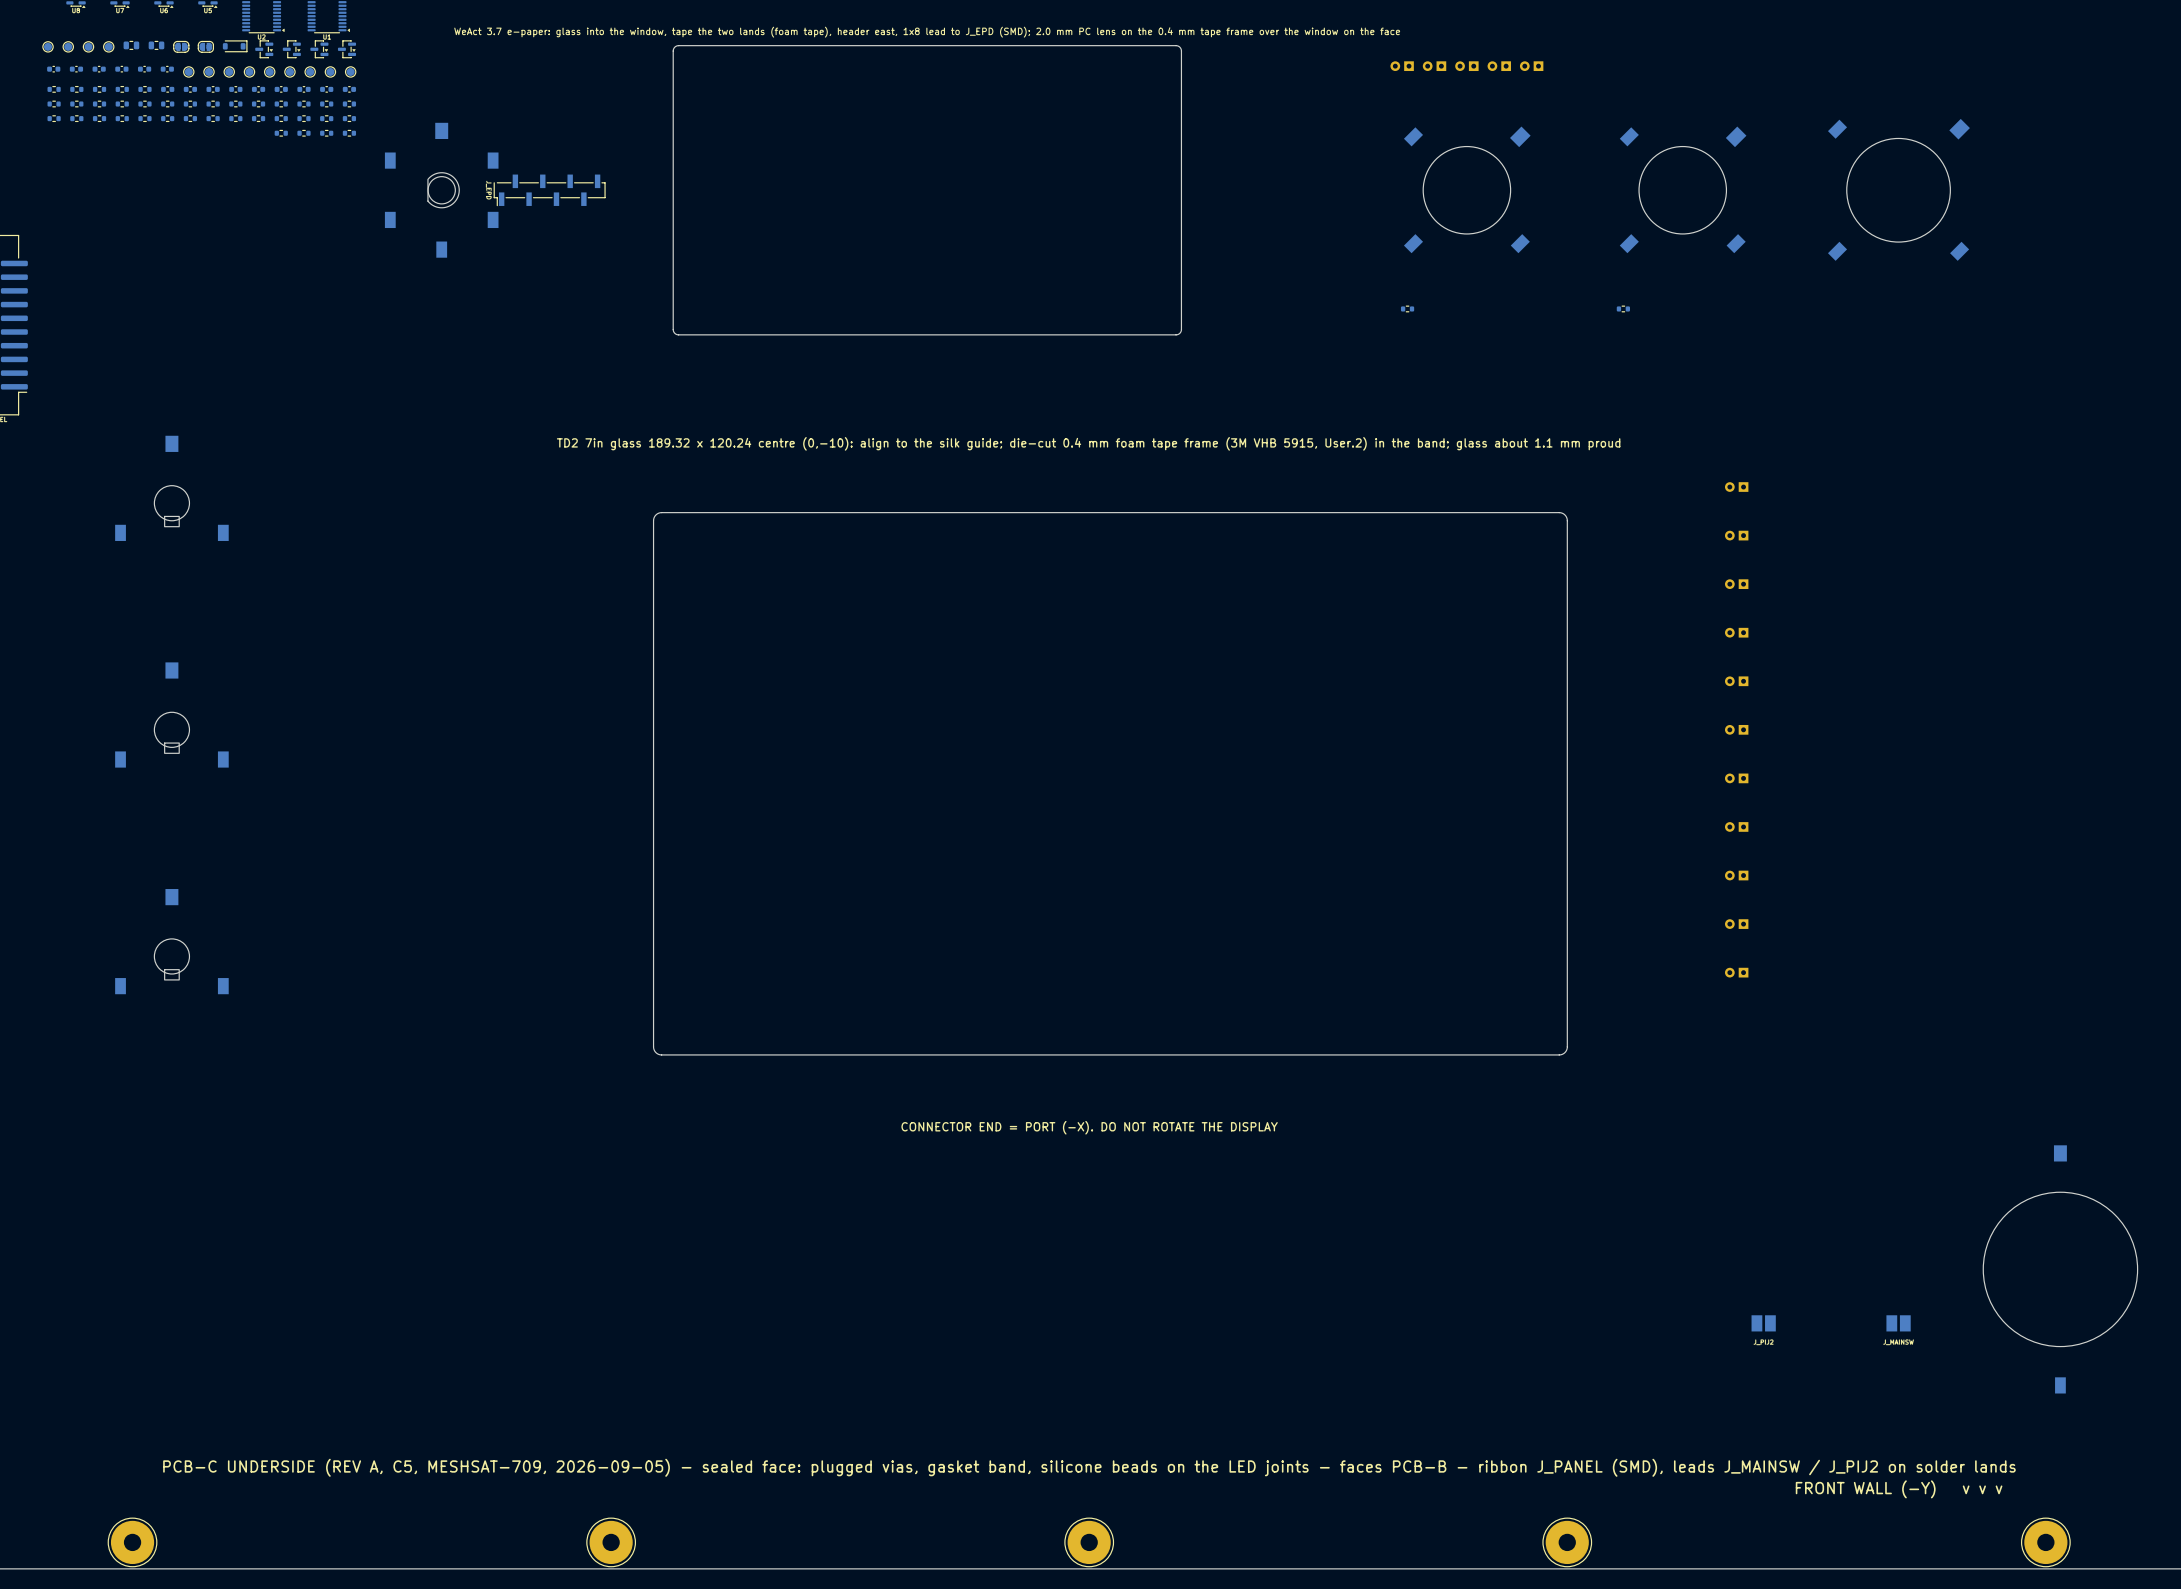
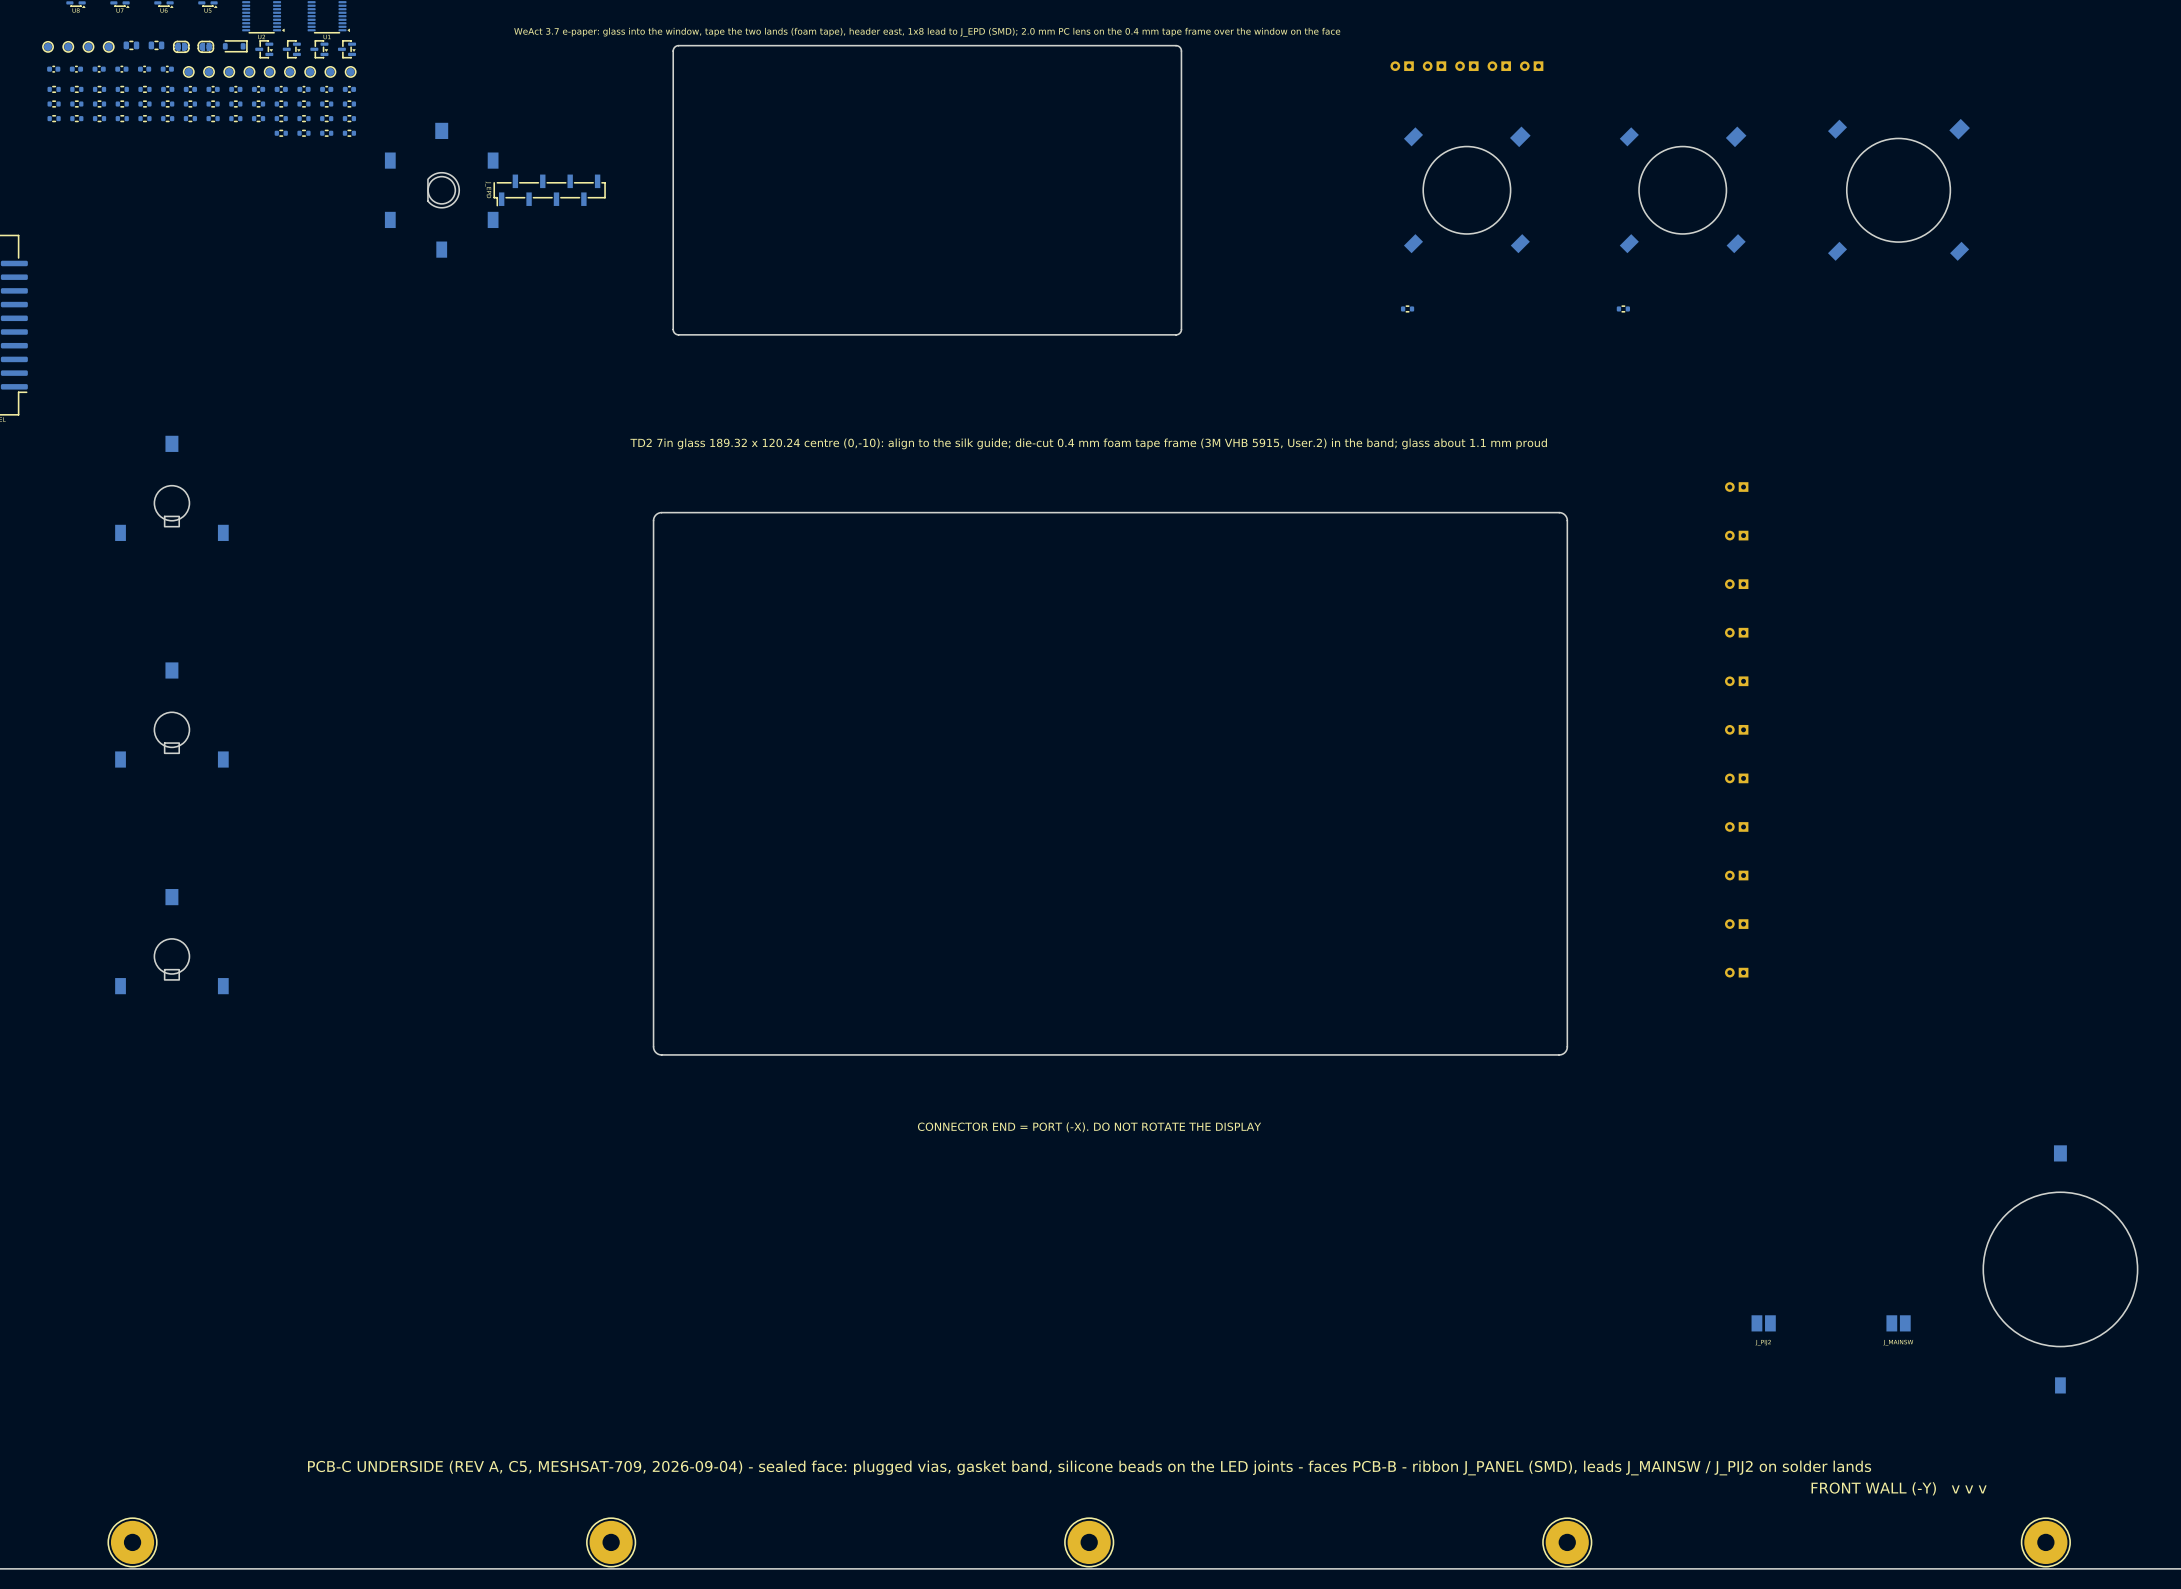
text: PCB-C UNDERSIDE (REV A, C5, MESHSAT-709, 2026-09-05) - sealed face: plugged vias, gasket band, silicone beads on the LED joints - faces PCB-B - ribbon J_PANEL (SMD), leads J_MAINSW / J_PIJ2 on solder lands (1089, 1467) -> PCB-C UNDERSIDE (REV A, C5, MESHSAT-709, 2026-09-04) - sealed face: plugged vias, gasket band, silicone beads on the LED joints - faces PCB-B - ribbon J_PANEL (SMD), leads J_MAINSW / J_PIJ2 on solder lands (1089, 1468)

